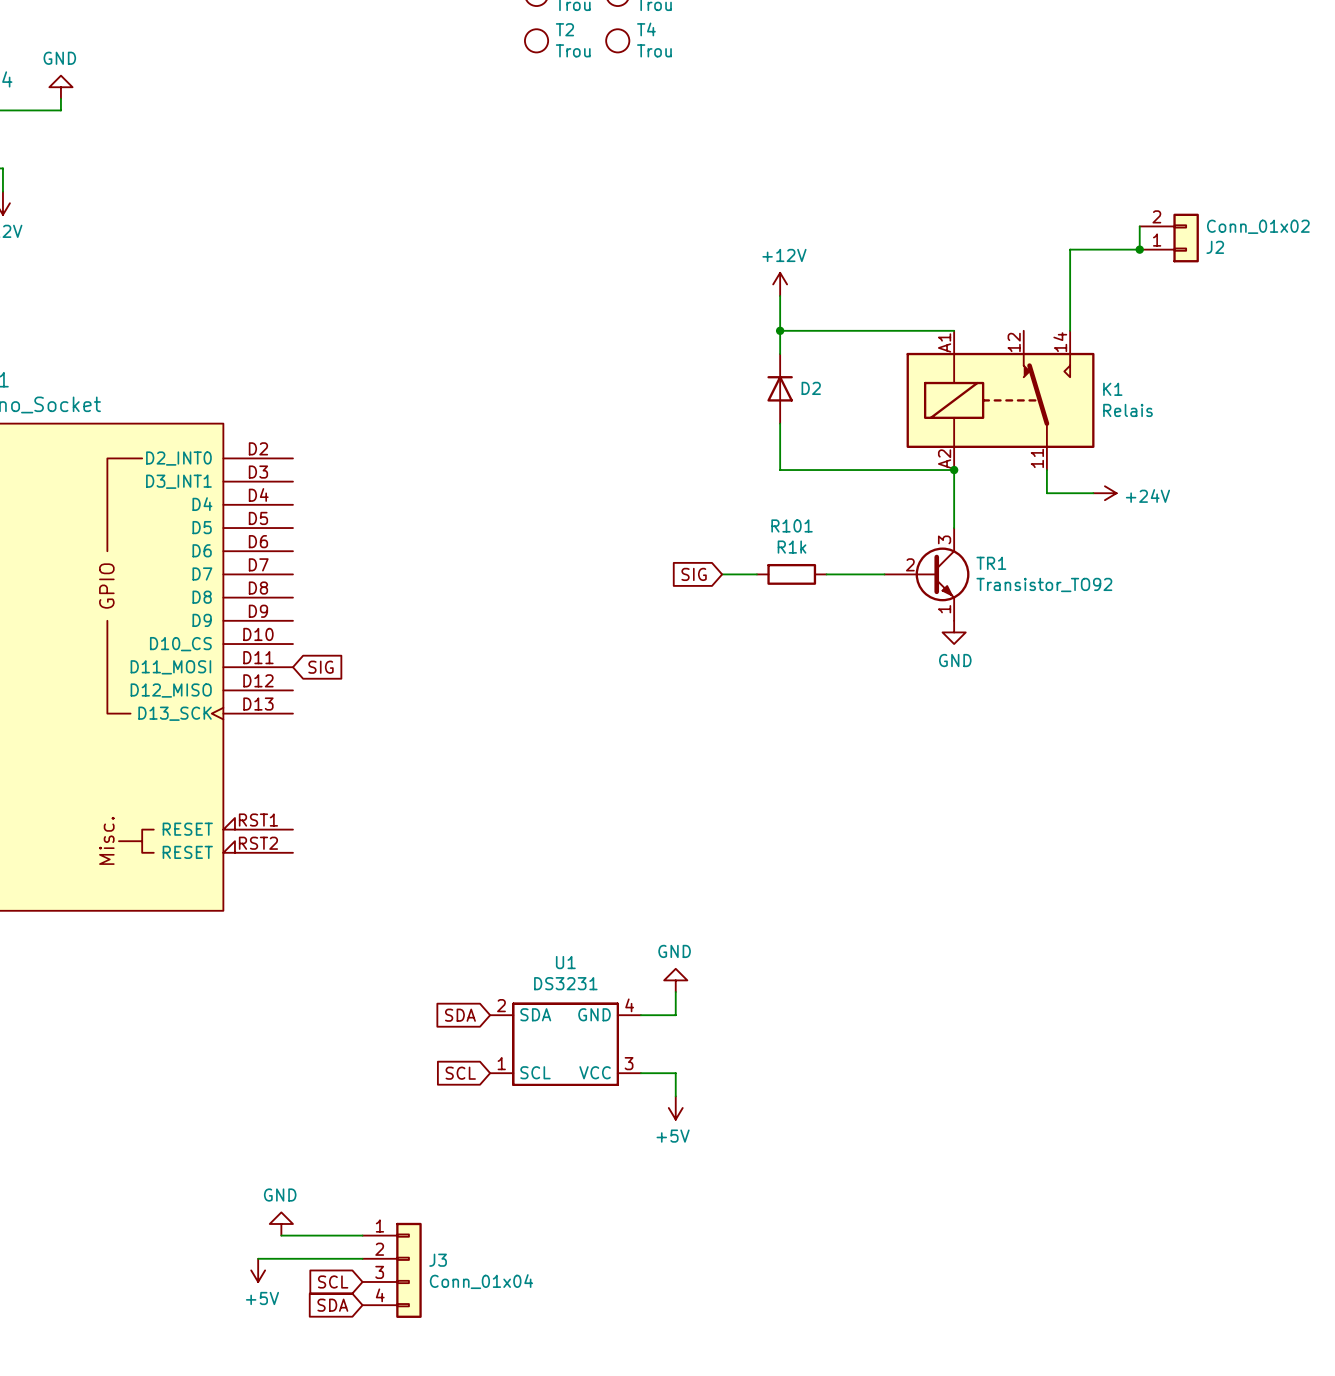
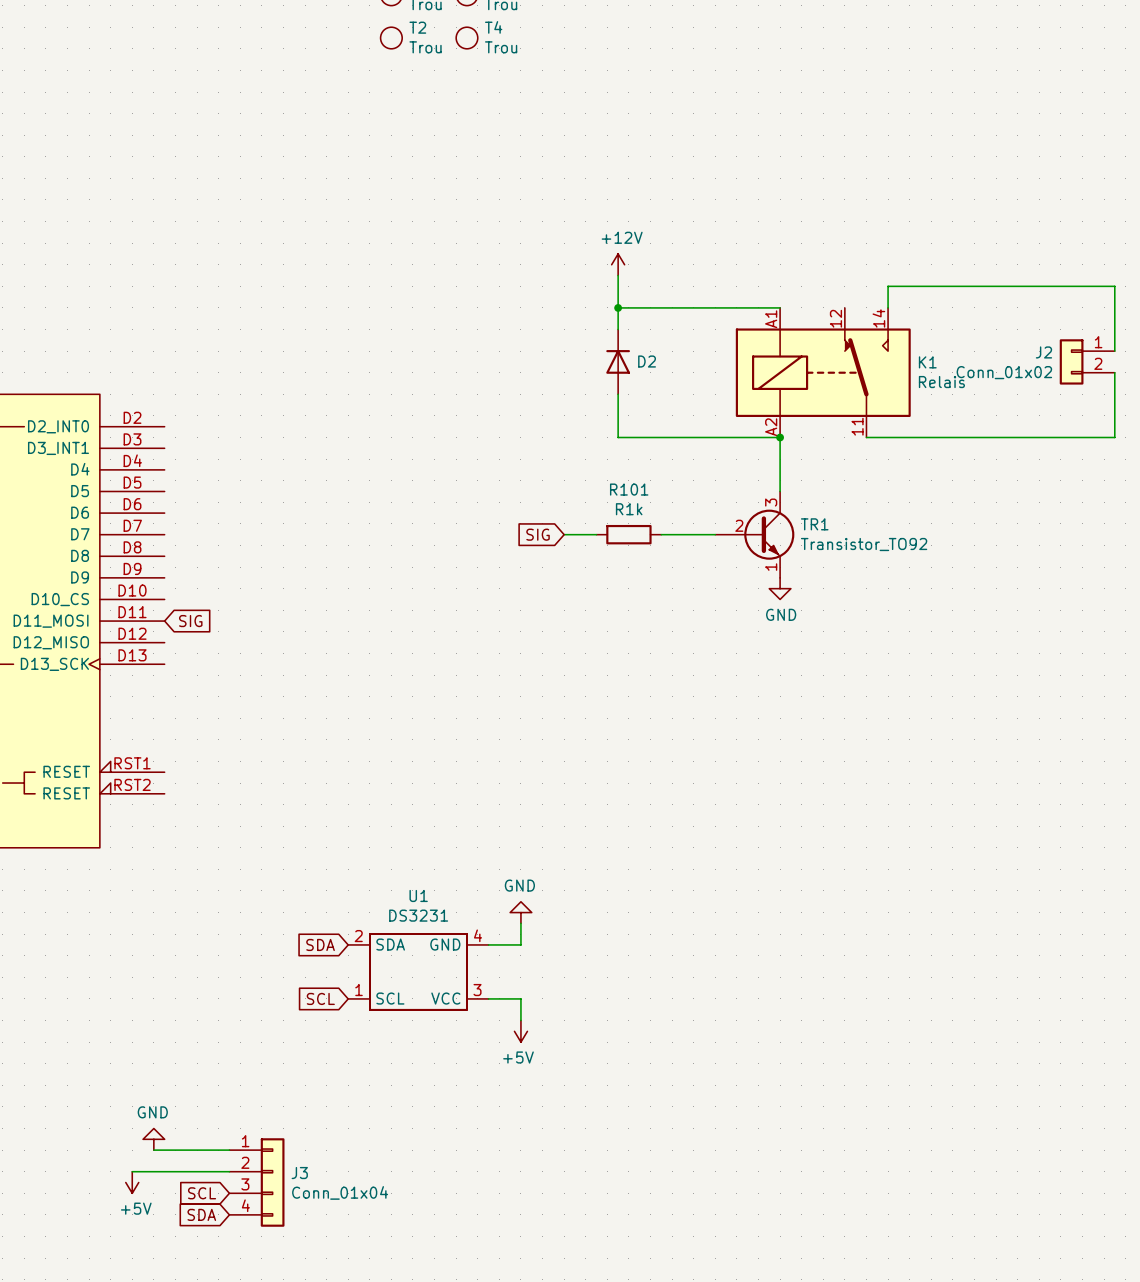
wire: (1139, 226) (1139, 249) (1070, 249) (1070, 307) -> (1114, 351) (1114, 286) (888, 286)
J2 position: (1169, 238) -> (1087, 361)
J2 rotation: 0° (1186, 238) -> 180° (1071, 361)
junction: (1139, 249) -> none
wire: (1046, 470) (1046, 493) (1093, 493) -> (866, 437) (1114, 437) (1114, 372)
power symbol: +24V (1104, 493) -> none

